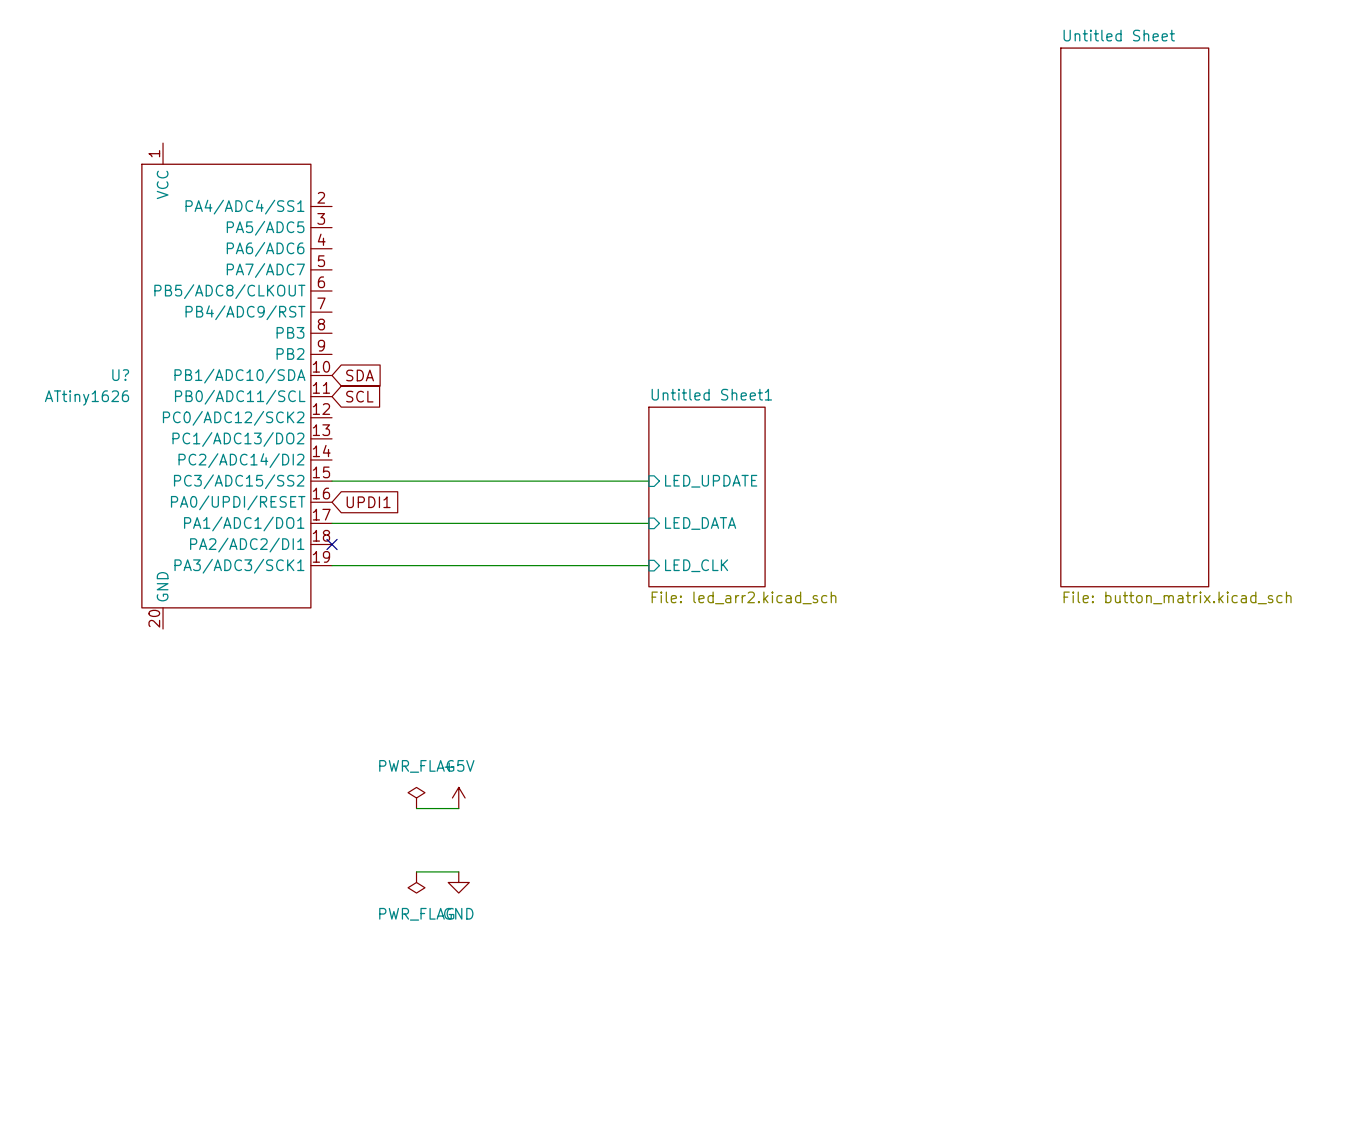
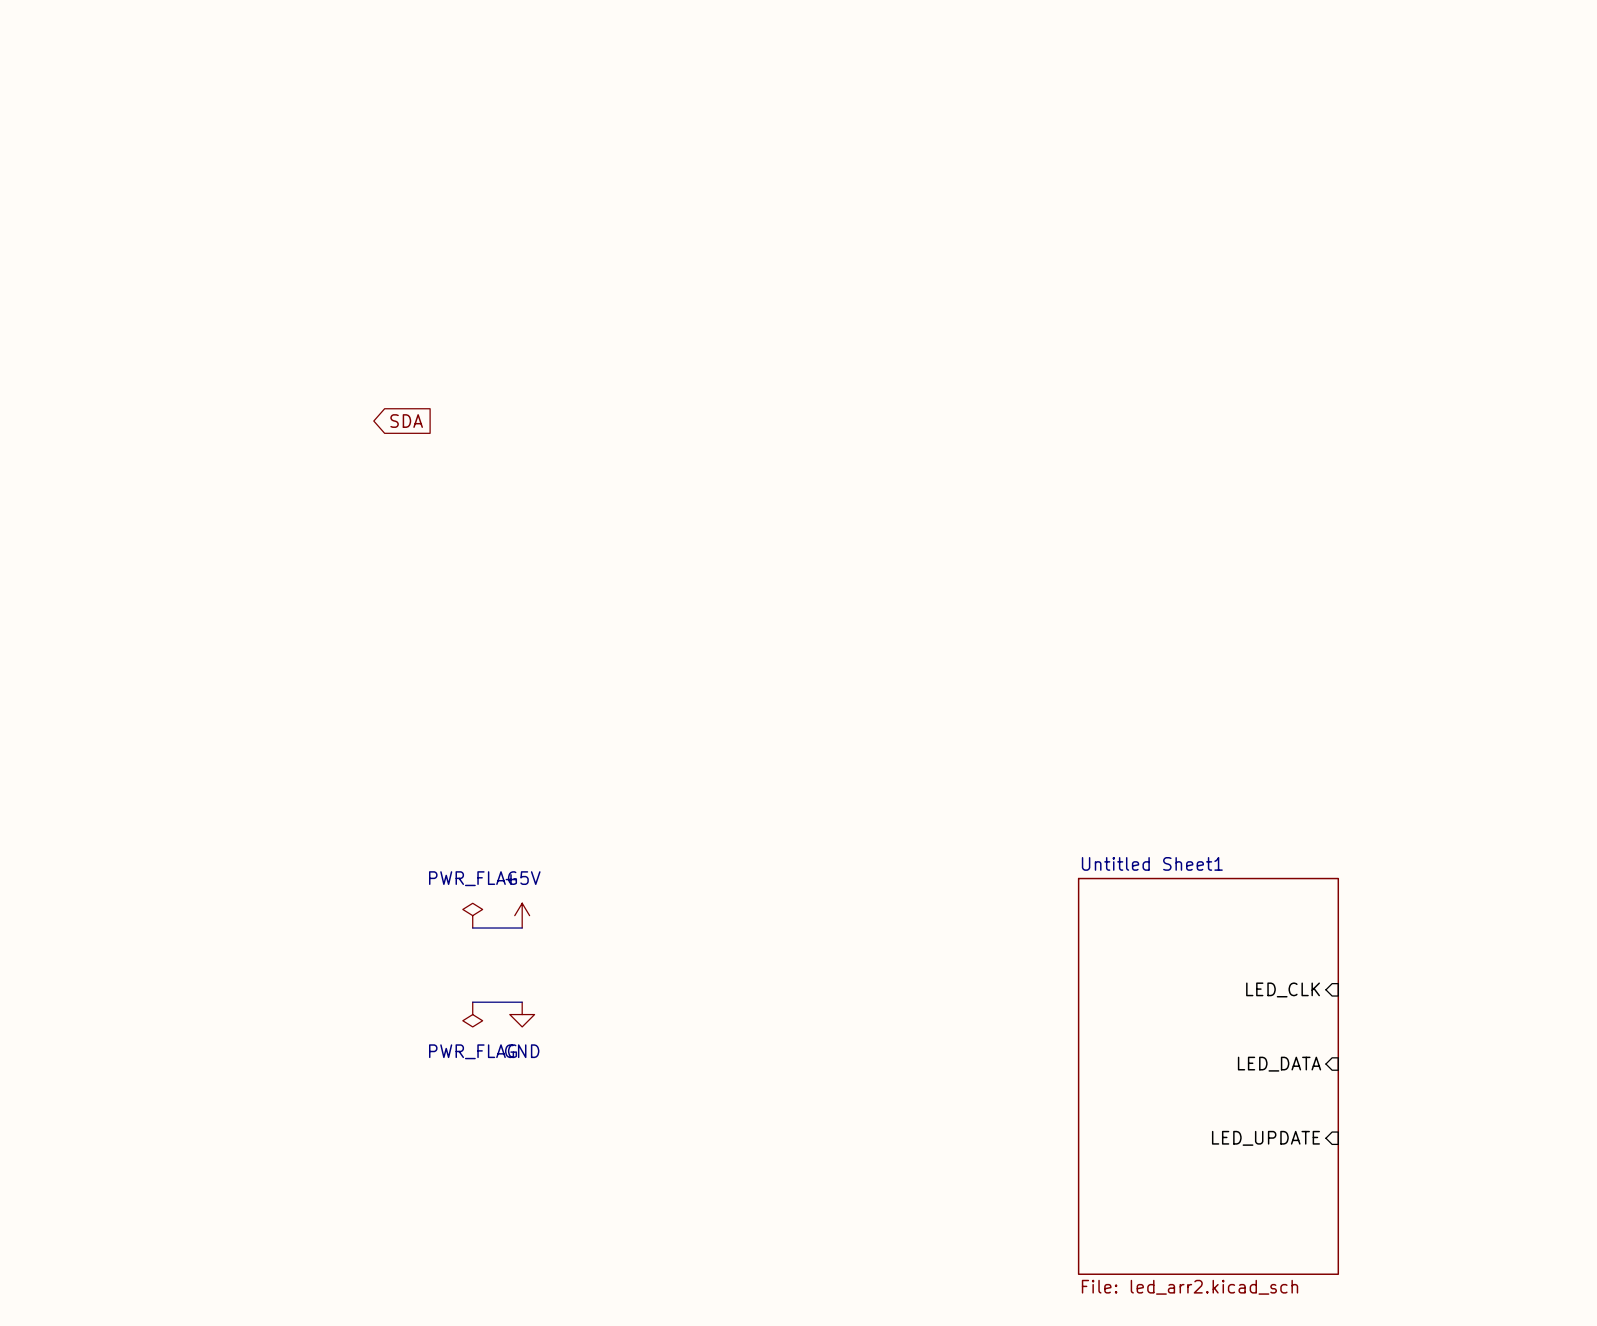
sheet Untitled Sheet: File: button_matrix.kicad_sch (1134, 317) -> none
U?: ATtiny1626 (236, 386) -> none
sheet Untitled Sheet1 name position: Untitled Sheet1 (711, 394) -> Untitled Sheet1 (1152, 863)
global label: SCL (359, 396) -> none
sheet Untitled Sheet1 shape: [648, 406, 766, 588] -> [1077, 877, 1340, 1275]
wire: (332, 481) (648, 481) -> none
sheet pin: LED_UPDATE (711, 481) -> none
global label: UPDI1 (368, 502) -> none
wire: (332, 523) (648, 523) -> none
sheet pin: LED_DATA (700, 523) -> none
no-connect mark: (332, 544) -> none
wire: (332, 565) (648, 565) -> none
sheet pin: LED_CLK (696, 565) -> none
sheet Untitled Sheet1 value position: File: led_arr2.kicad_sch (744, 597) -> File: led_arr2.kicad_sch (1190, 1287)
sheet pin: none -> LED_CLK (1283, 989)
sheet pin: none -> LED_DATA (1279, 1064)
sheet pin: none -> LED_UPDATE (1265, 1138)

